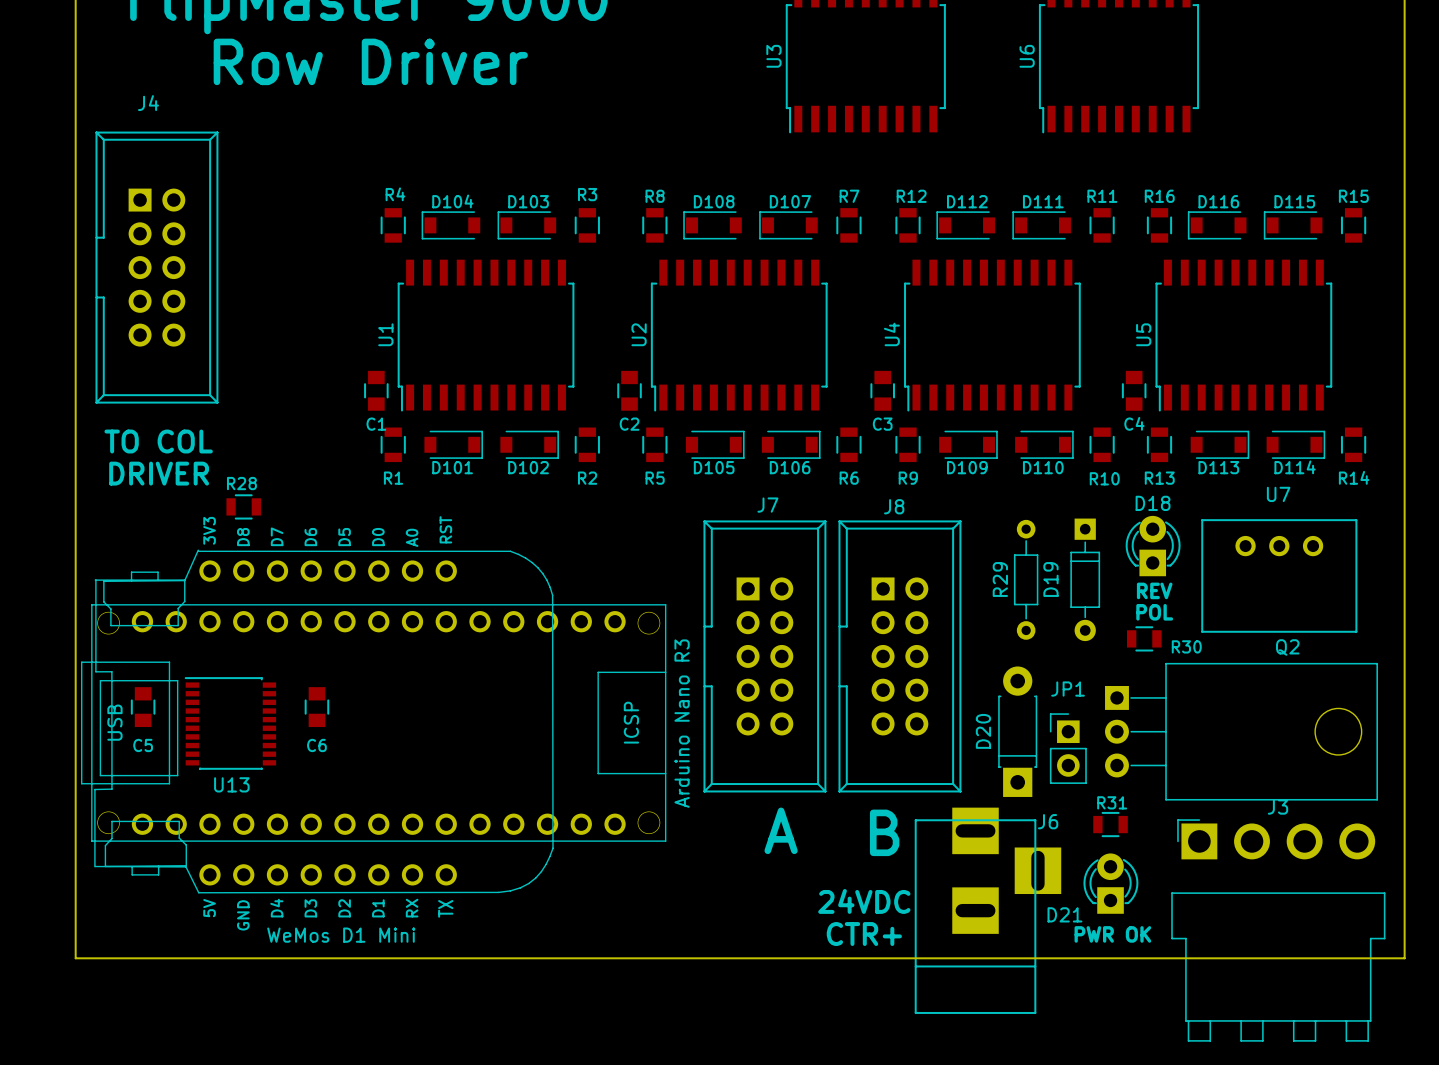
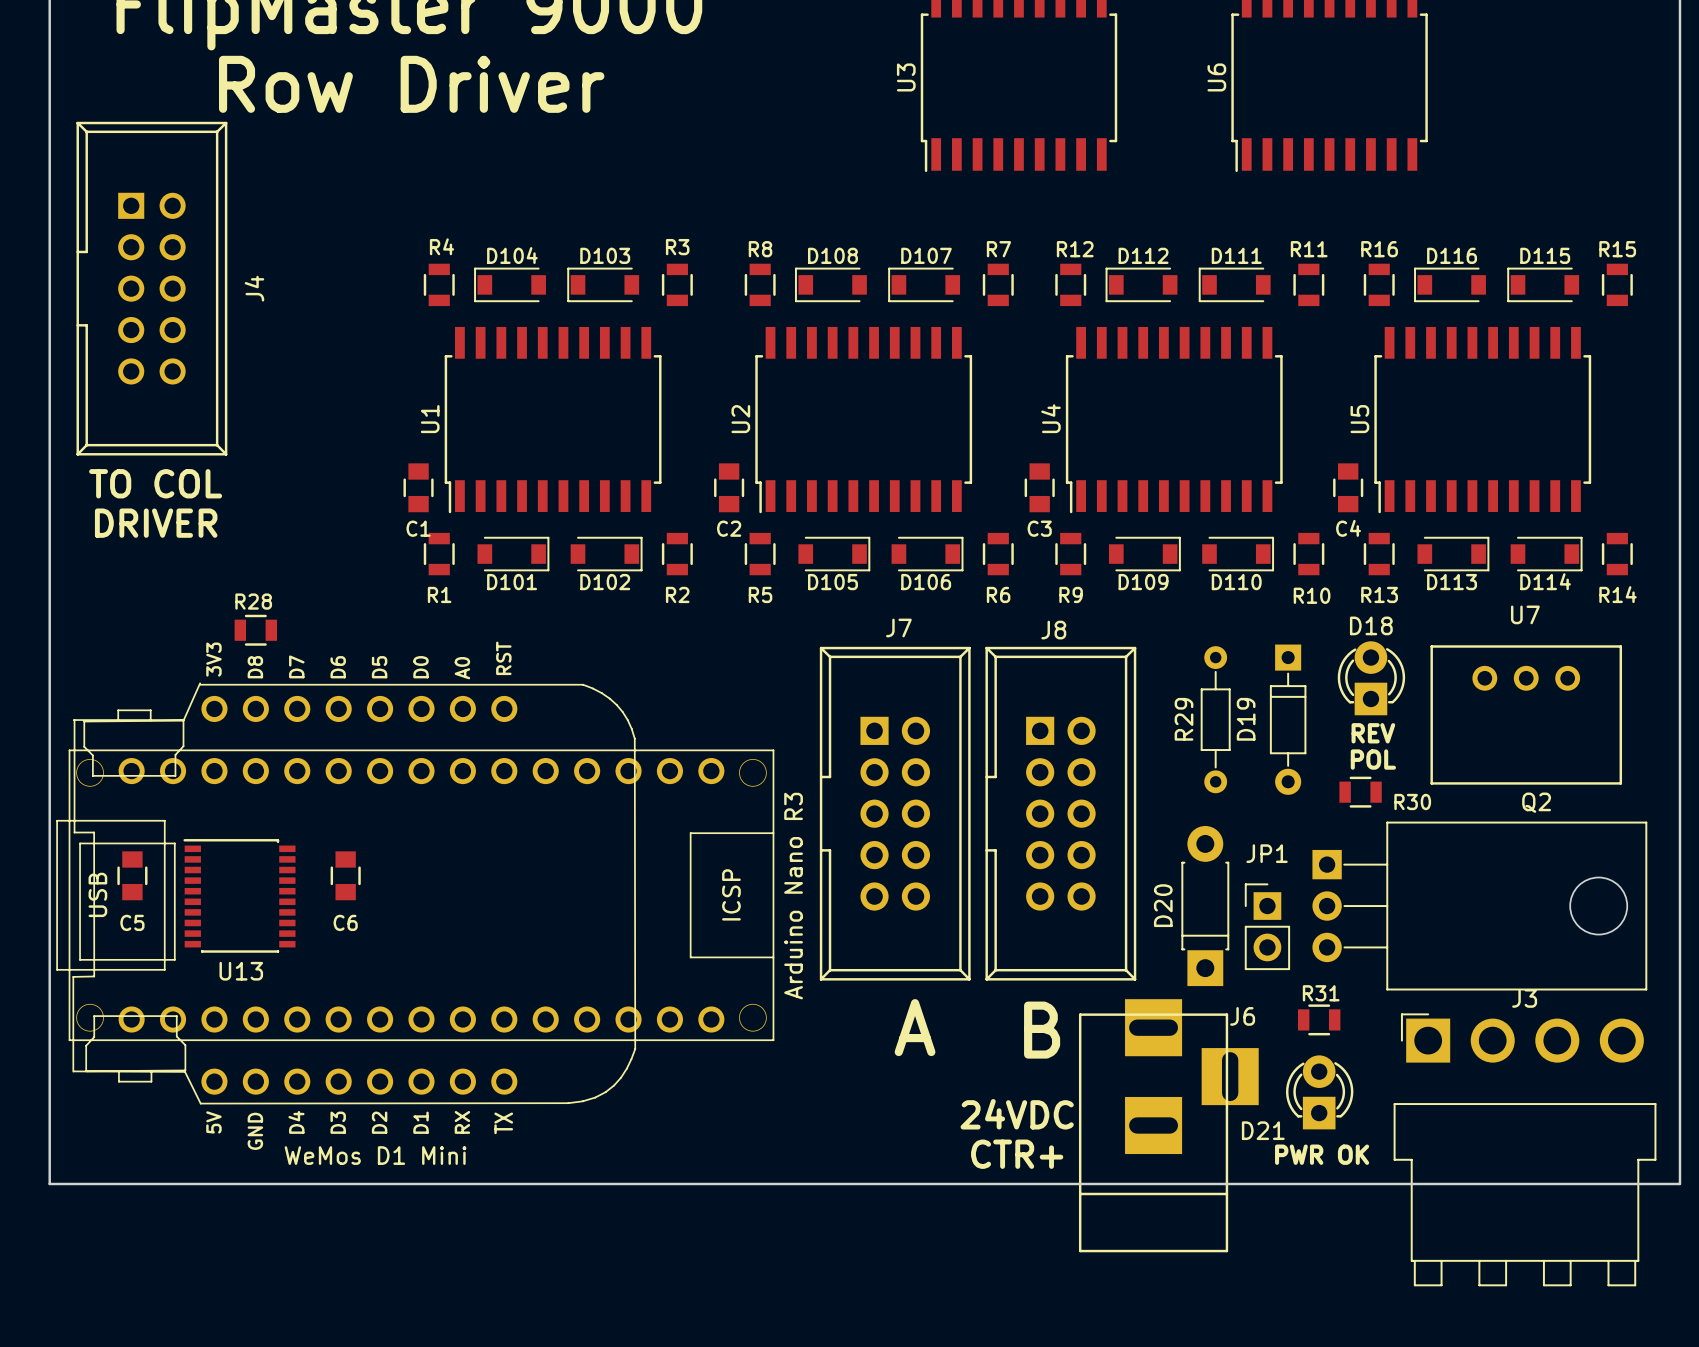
J4 name position: J4 (148, 103) -> J4 (254, 288)
J4 footprint: [95, 131, 219, 404] -> [76, 121, 228, 456]
text position: TO COL (158, 441) -> TO COL (155, 483)
text position: DRIVER (159, 473) -> DRIVER (156, 523)

